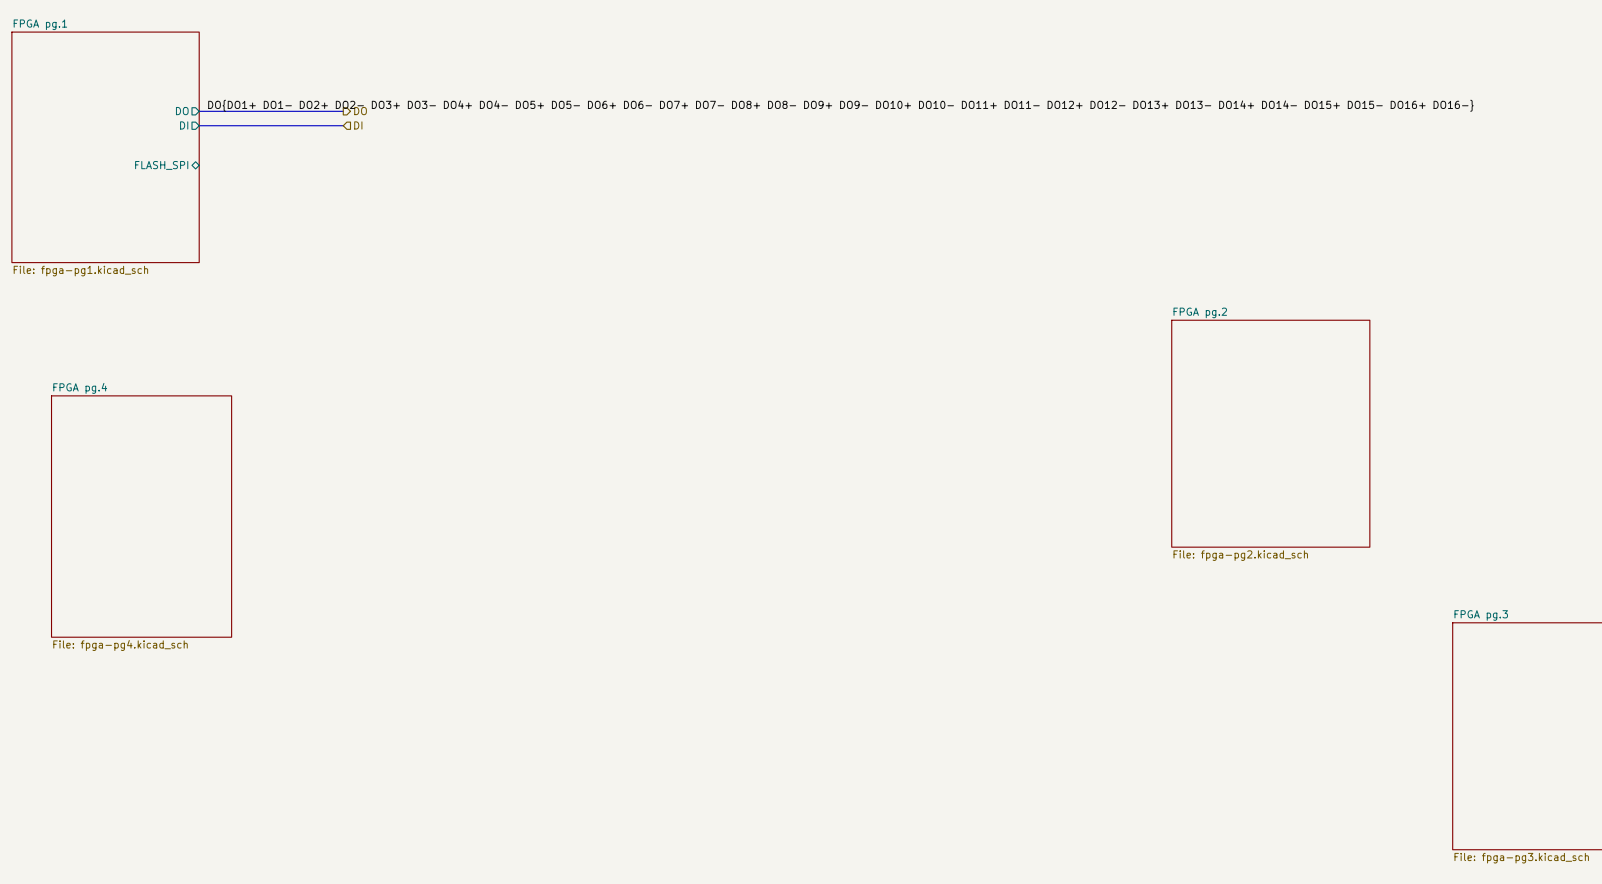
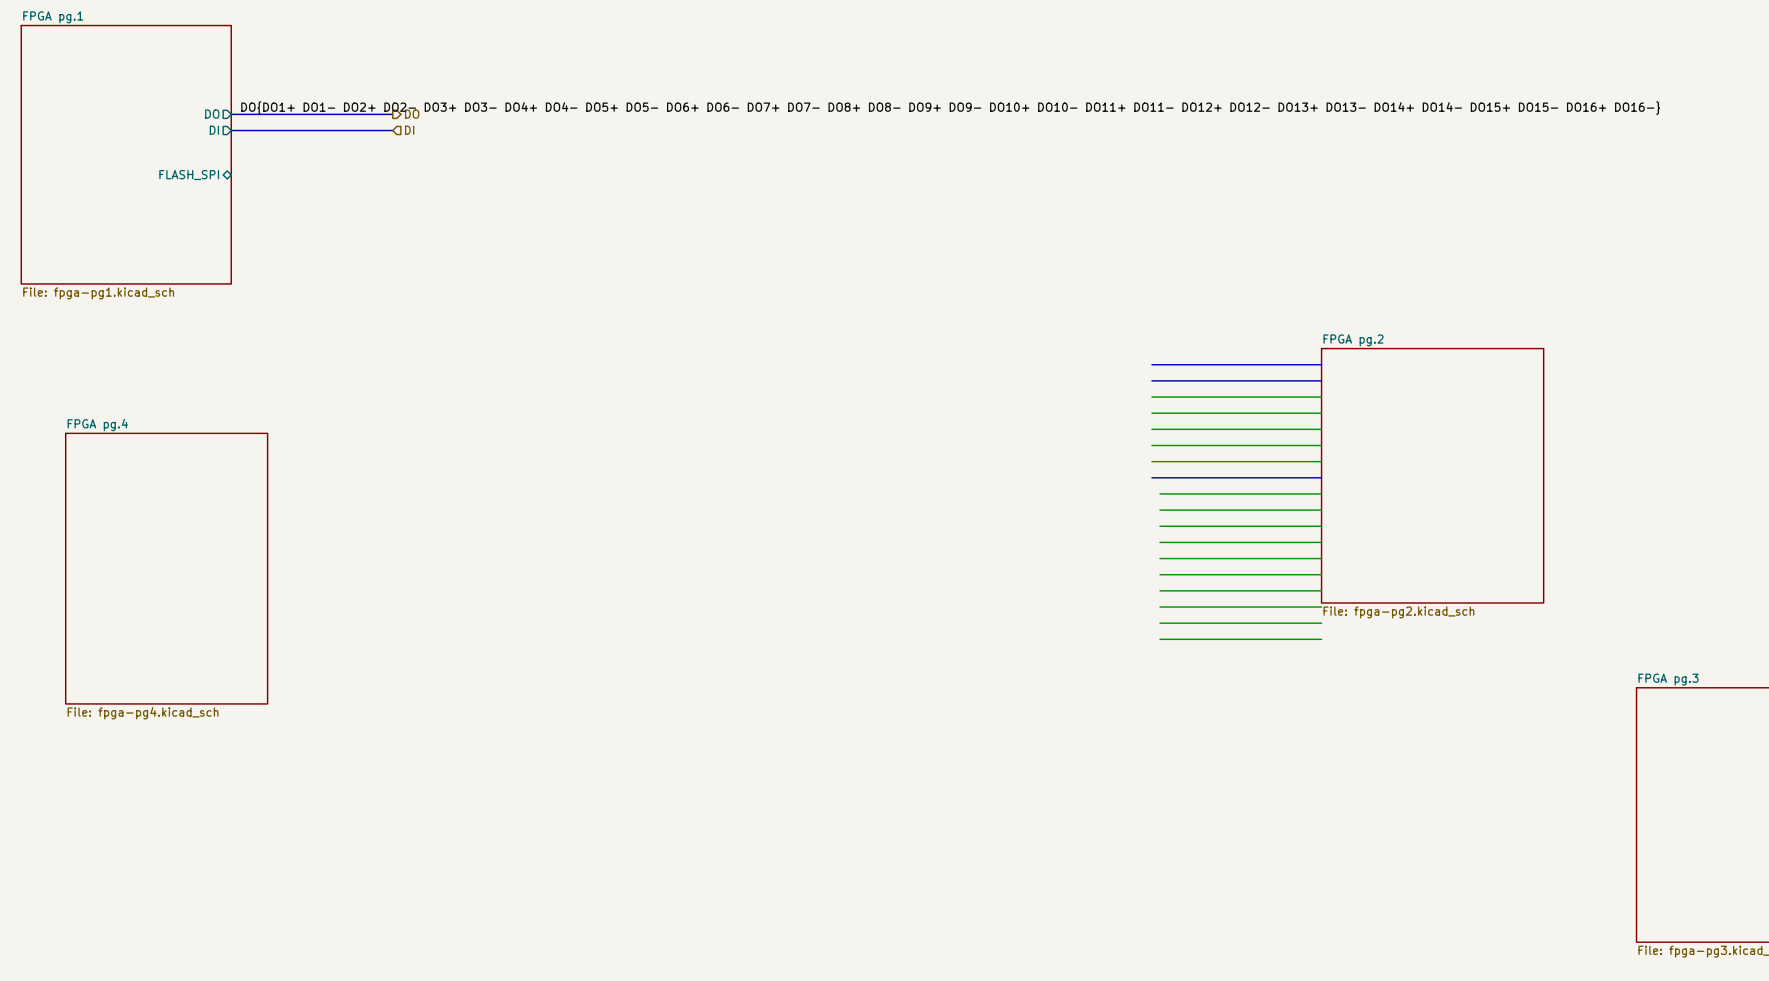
bus: none -> (1151, 364) (1321, 364)
bus: none -> (1151, 380) (1321, 380)
wire: none -> (1151, 397) (1321, 397)
wire: none -> (1151, 413) (1321, 413)
wire: none -> (1151, 429) (1321, 429)
wire: none -> (1151, 445) (1321, 445)
wire: none -> (1151, 461) (1321, 461)
bus: none -> (1151, 477) (1321, 477)
wire: none -> (1160, 493) (1321, 493)
wire: none -> (1160, 510) (1321, 510)
wire: none -> (1160, 526) (1321, 526)
wire: none -> (1160, 542) (1321, 542)
wire: none -> (1160, 558) (1321, 558)
wire: none -> (1160, 574) (1321, 574)
wire: none -> (1160, 590) (1321, 590)
wire: none -> (1160, 607) (1321, 607)
wire: none -> (1160, 623) (1321, 623)
wire: none -> (1160, 639) (1321, 639)

